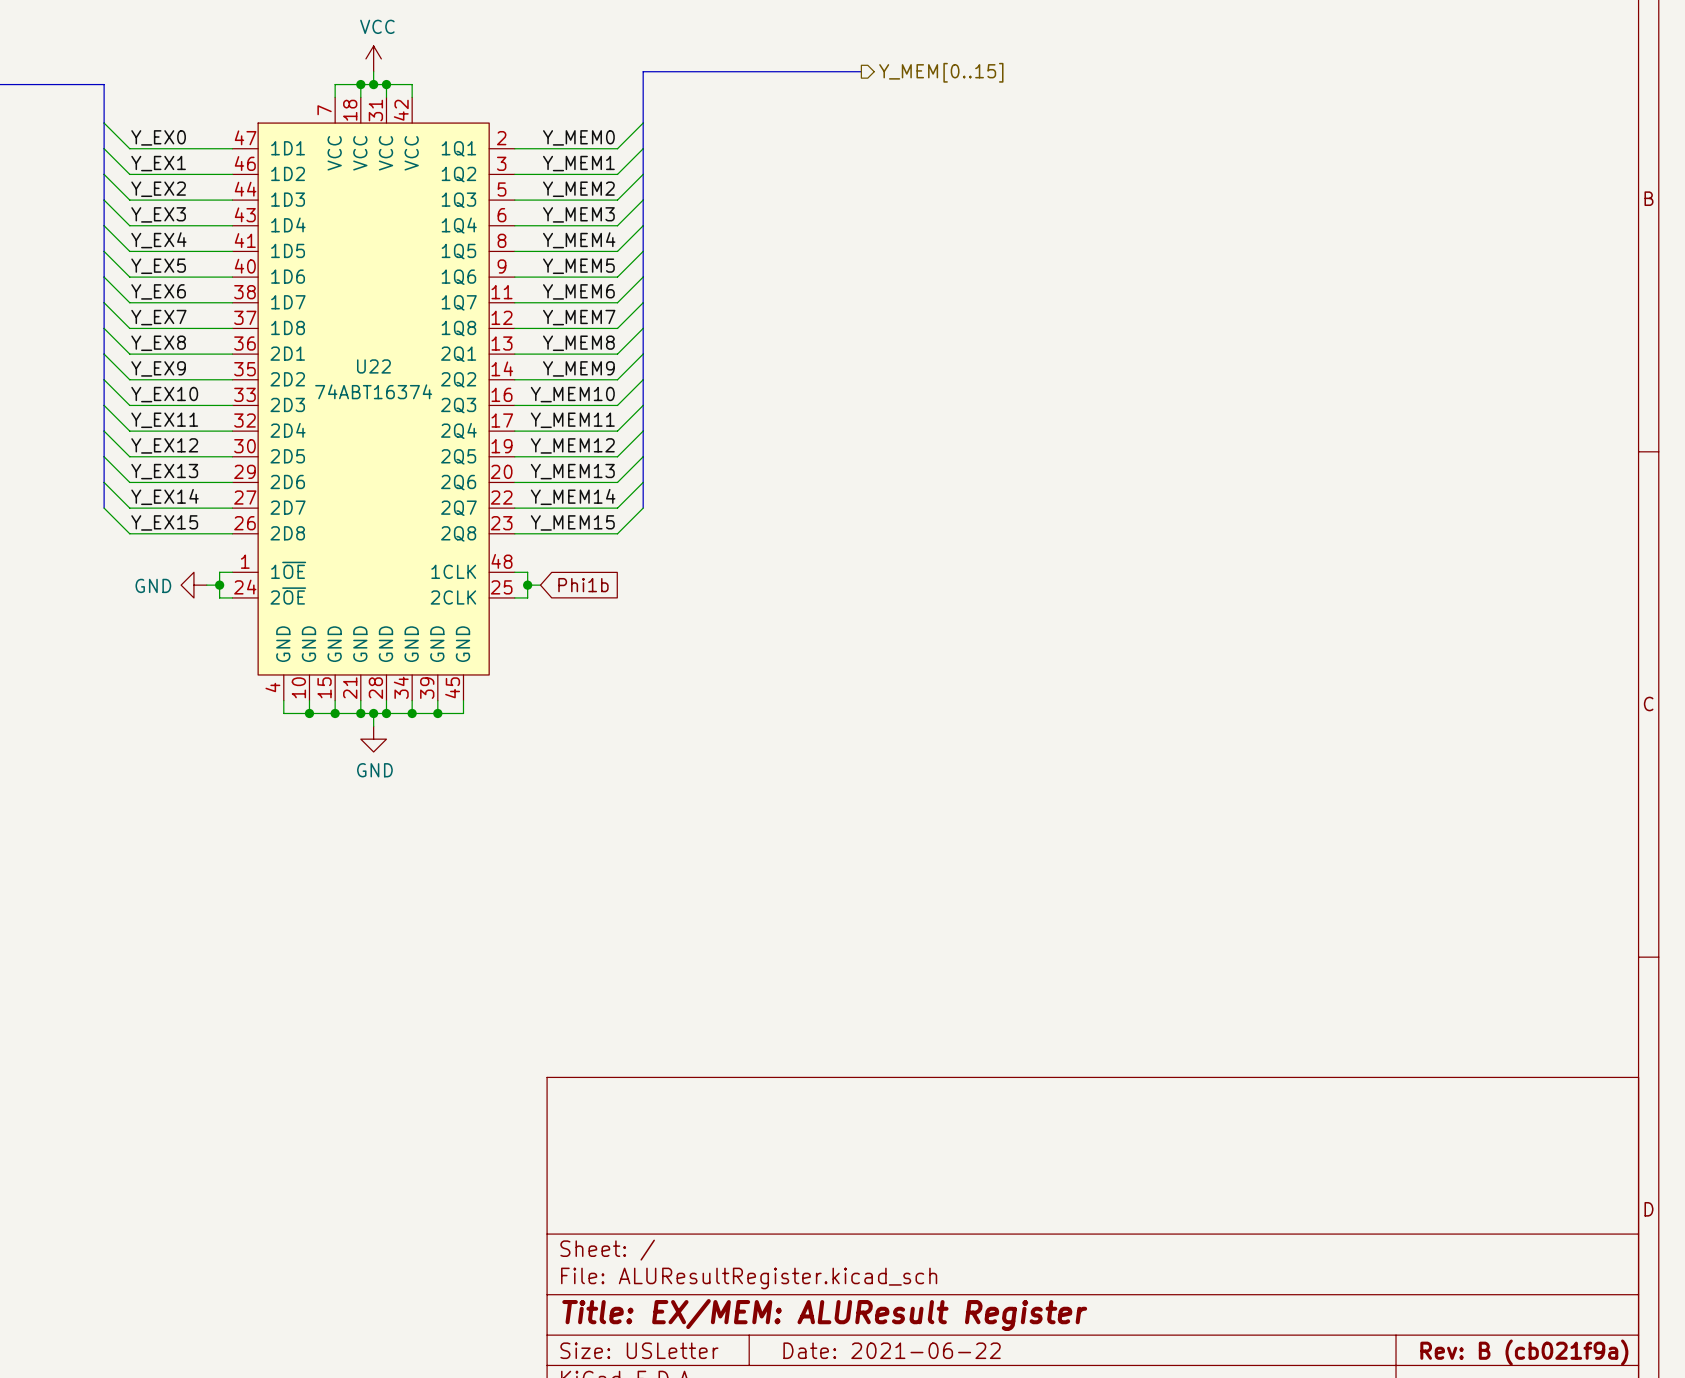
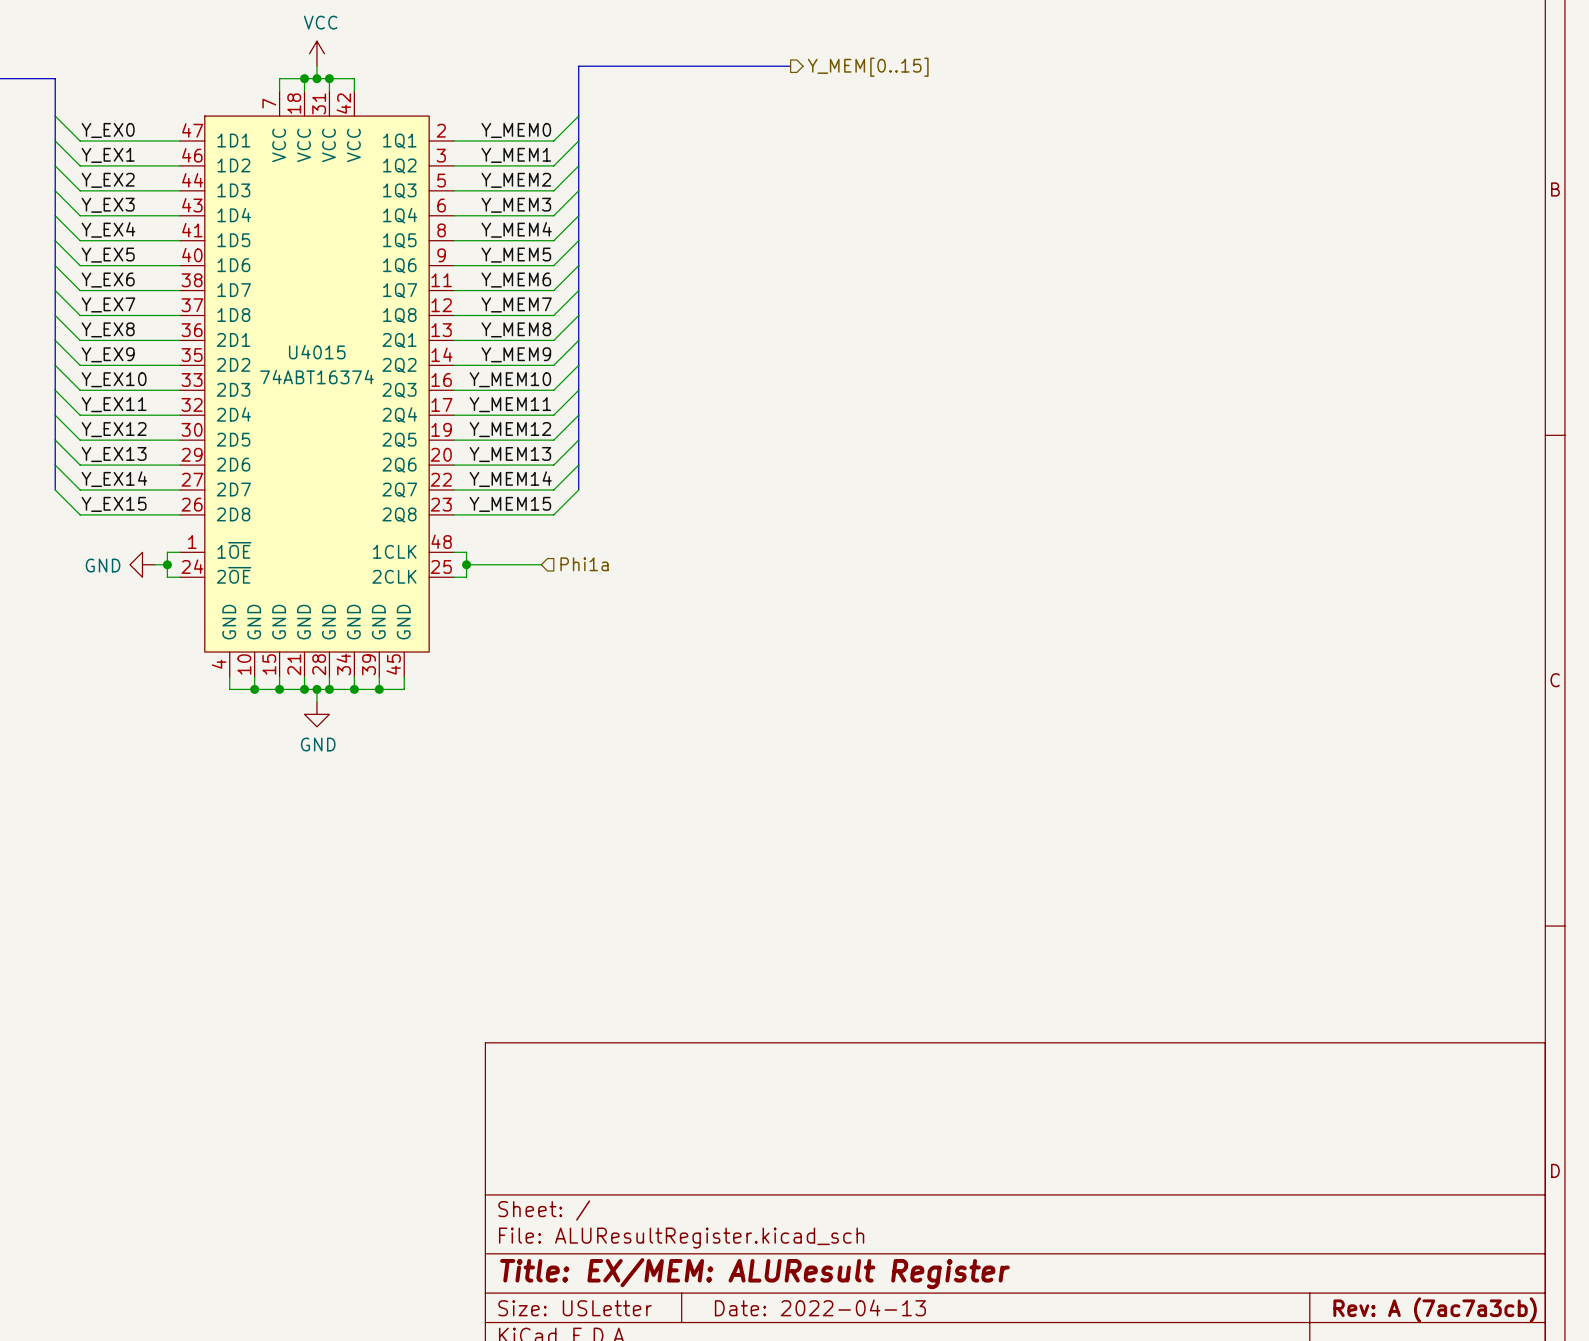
U22 name: U22 (373, 366) -> U4015 (317, 352)
hierarchical label: none -> Phi1a (584, 564)
wire: none -> (479, 564) (541, 564)
global label: Phi1b (583, 585) -> none
title block: Date: 2021-06-22 (892, 1350) -> Date: 2022-04-13 (820, 1307)
title block: Rev: B (cb021f9a) (1524, 1352) -> Rev: A (7ac7a3cb) (1435, 1309)

